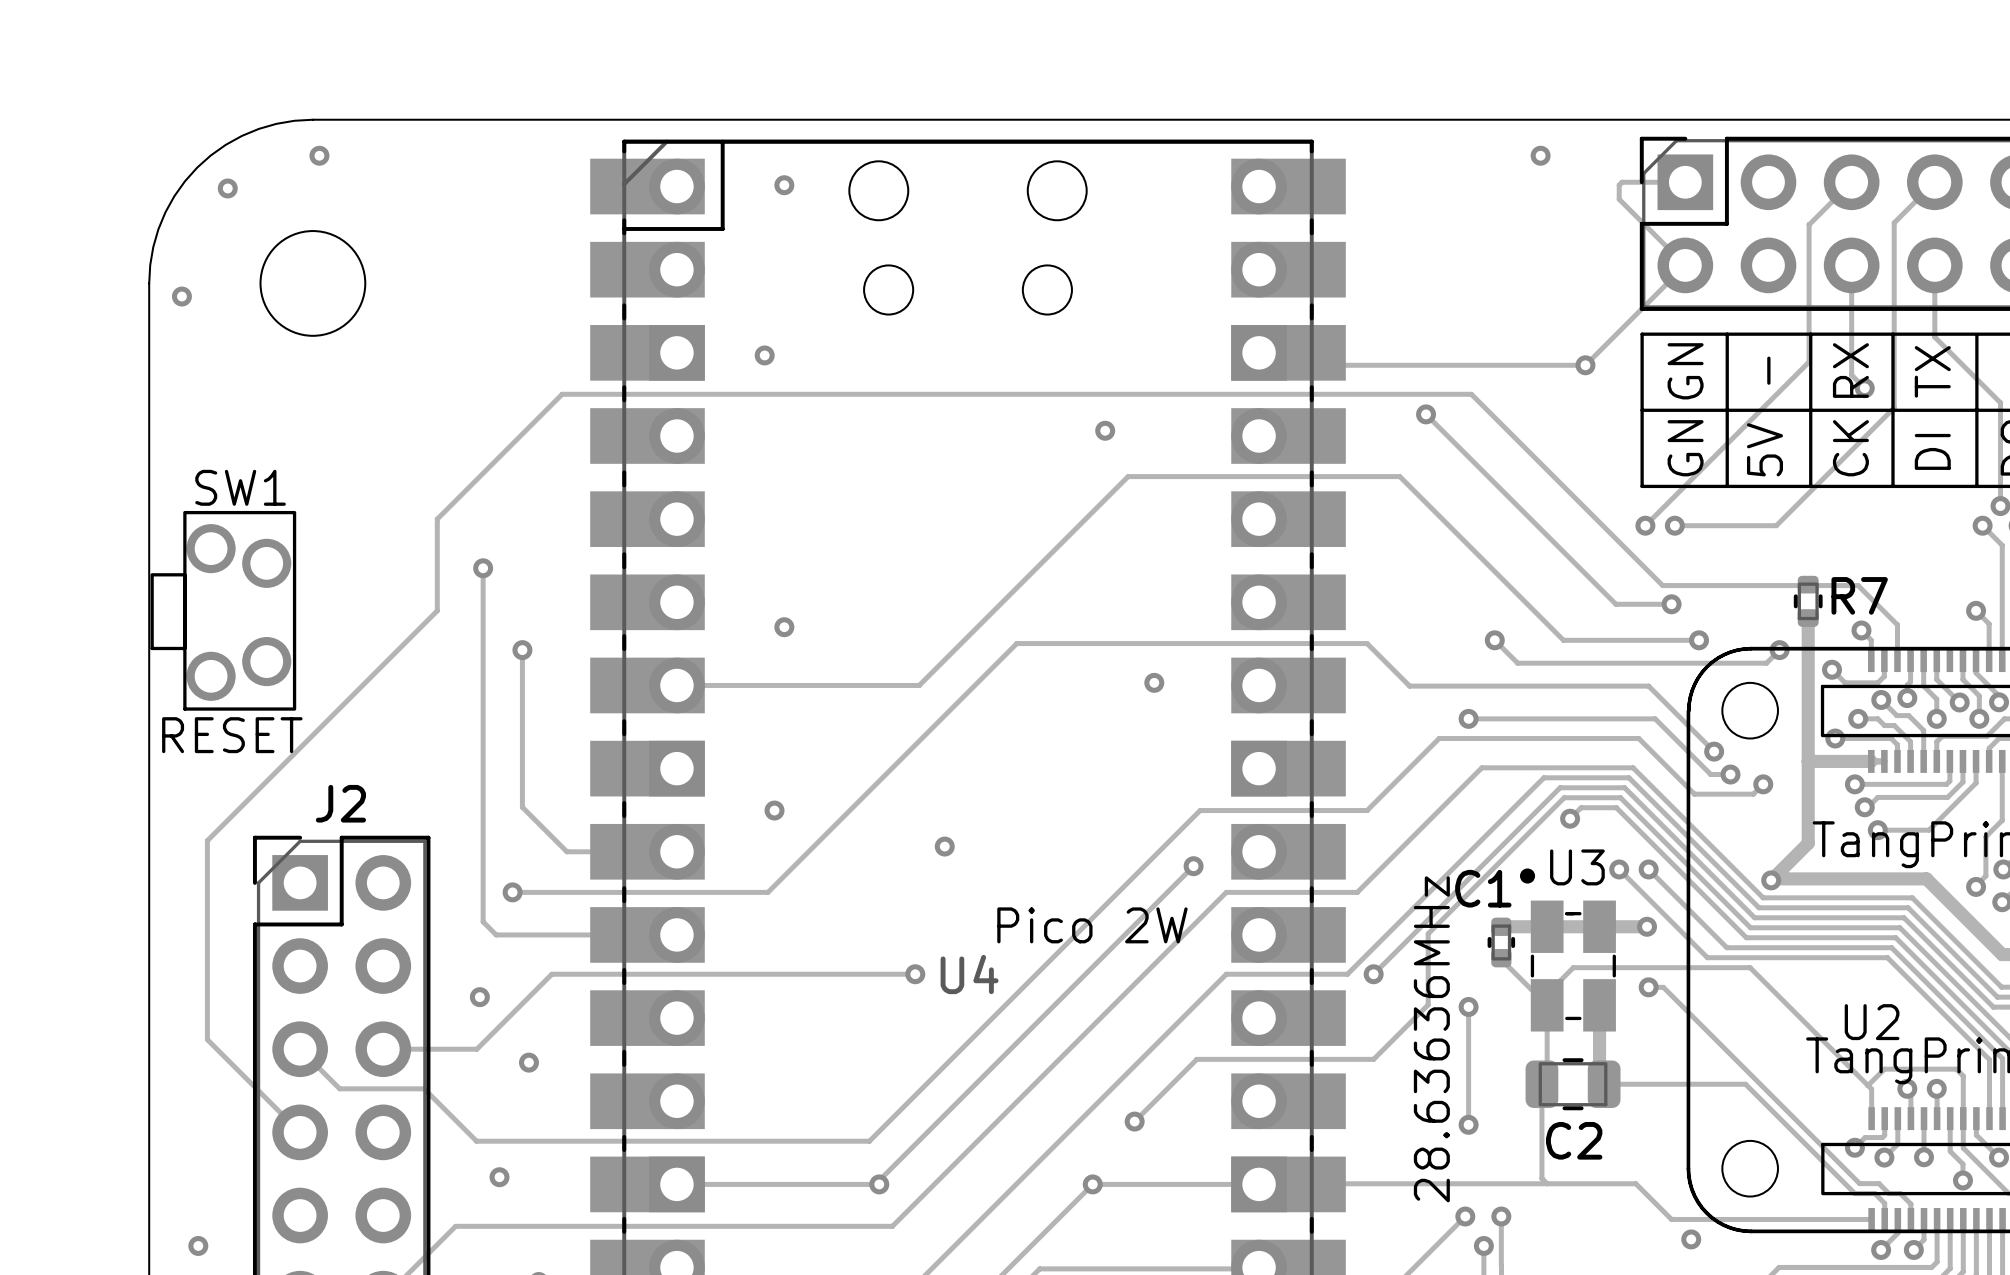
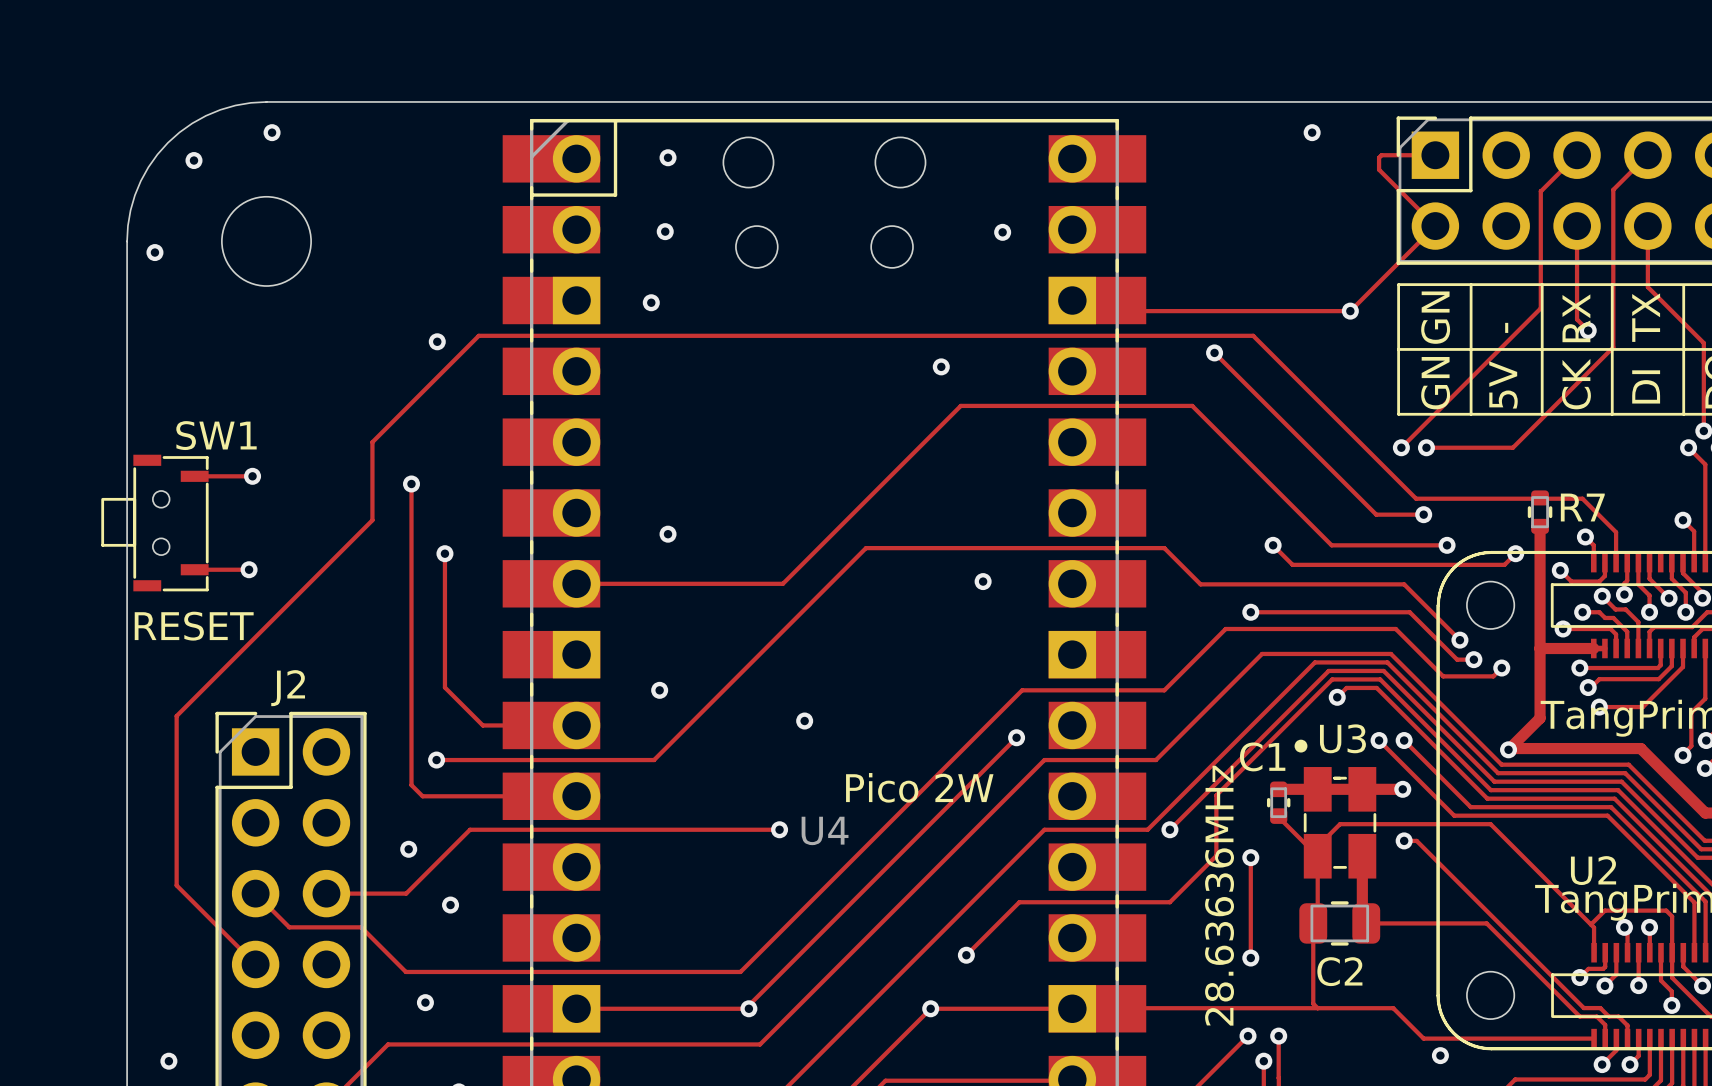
via: none -> (665, 231)
via: none -> (1002, 232)
via: none -> (437, 341)
SW1 footprint: [150, 510, 297, 711] -> [101, 454, 209, 592]
track: none -> (194, 476) (252, 476)
via: none -> (252, 476)
track: none -> (194, 569) (249, 569)
via: none -> (249, 569)

